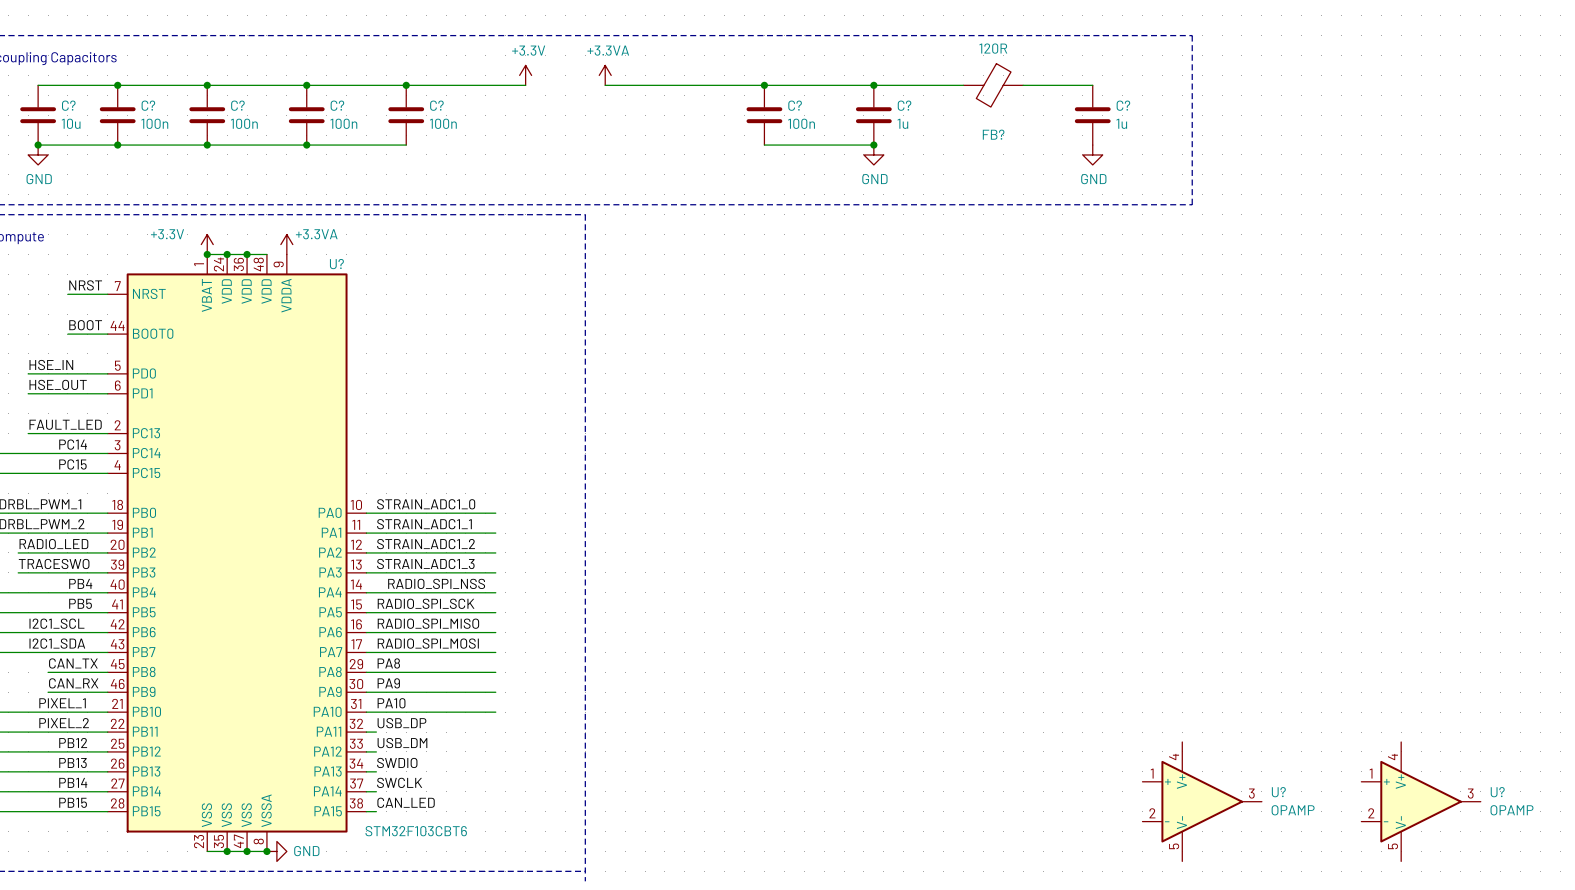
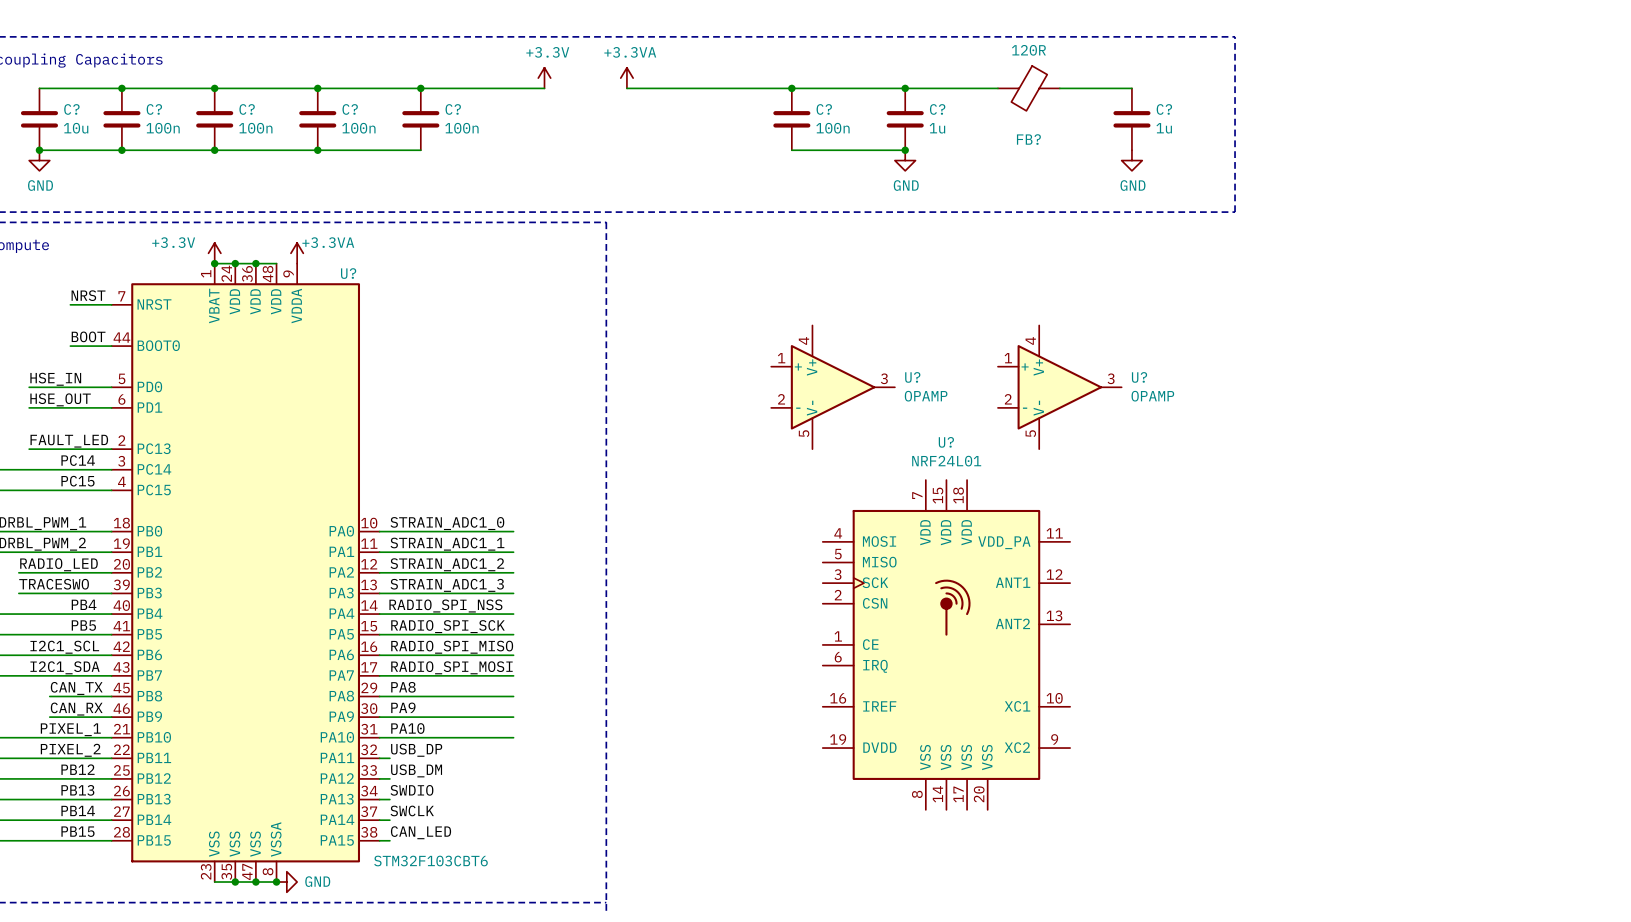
U?: none -> OPAMP (833, 387)
U?: none -> OPAMP (1059, 387)
U?: none -> NRF24L01 (946, 644)
U?: OPAMP (1202, 801) -> none
U?: OPAMP (1421, 801) -> none

